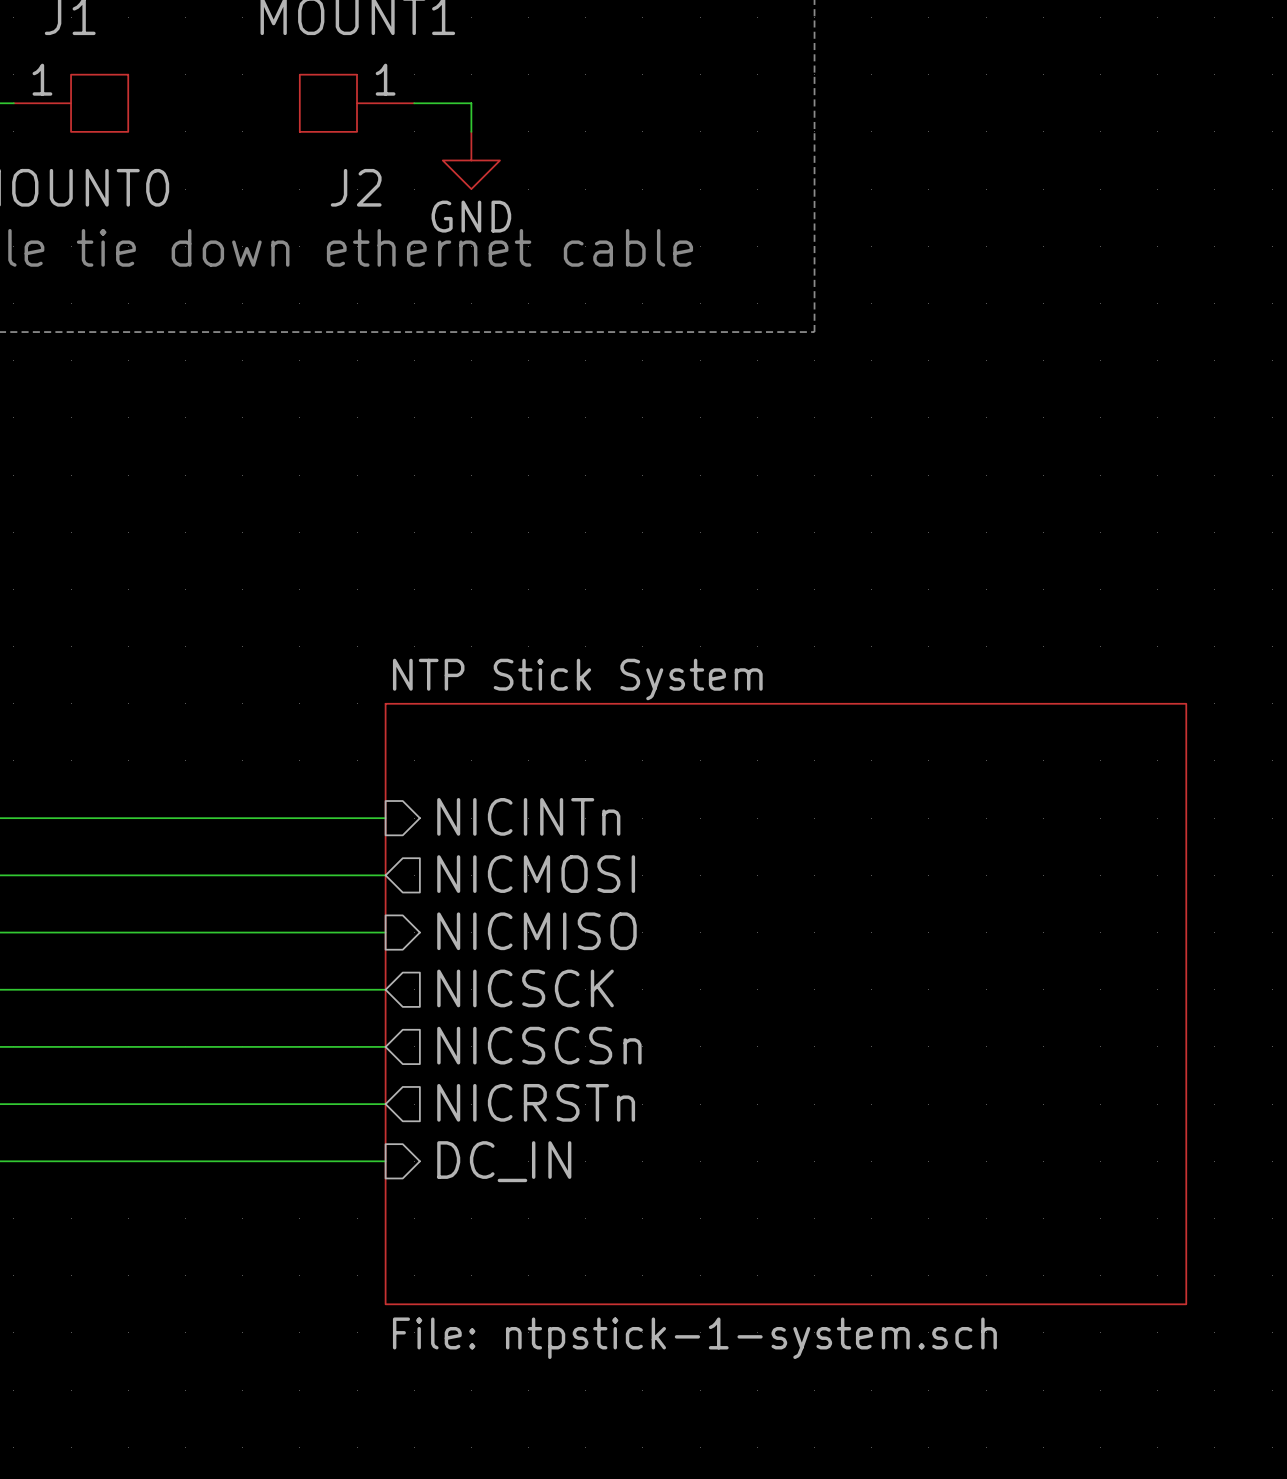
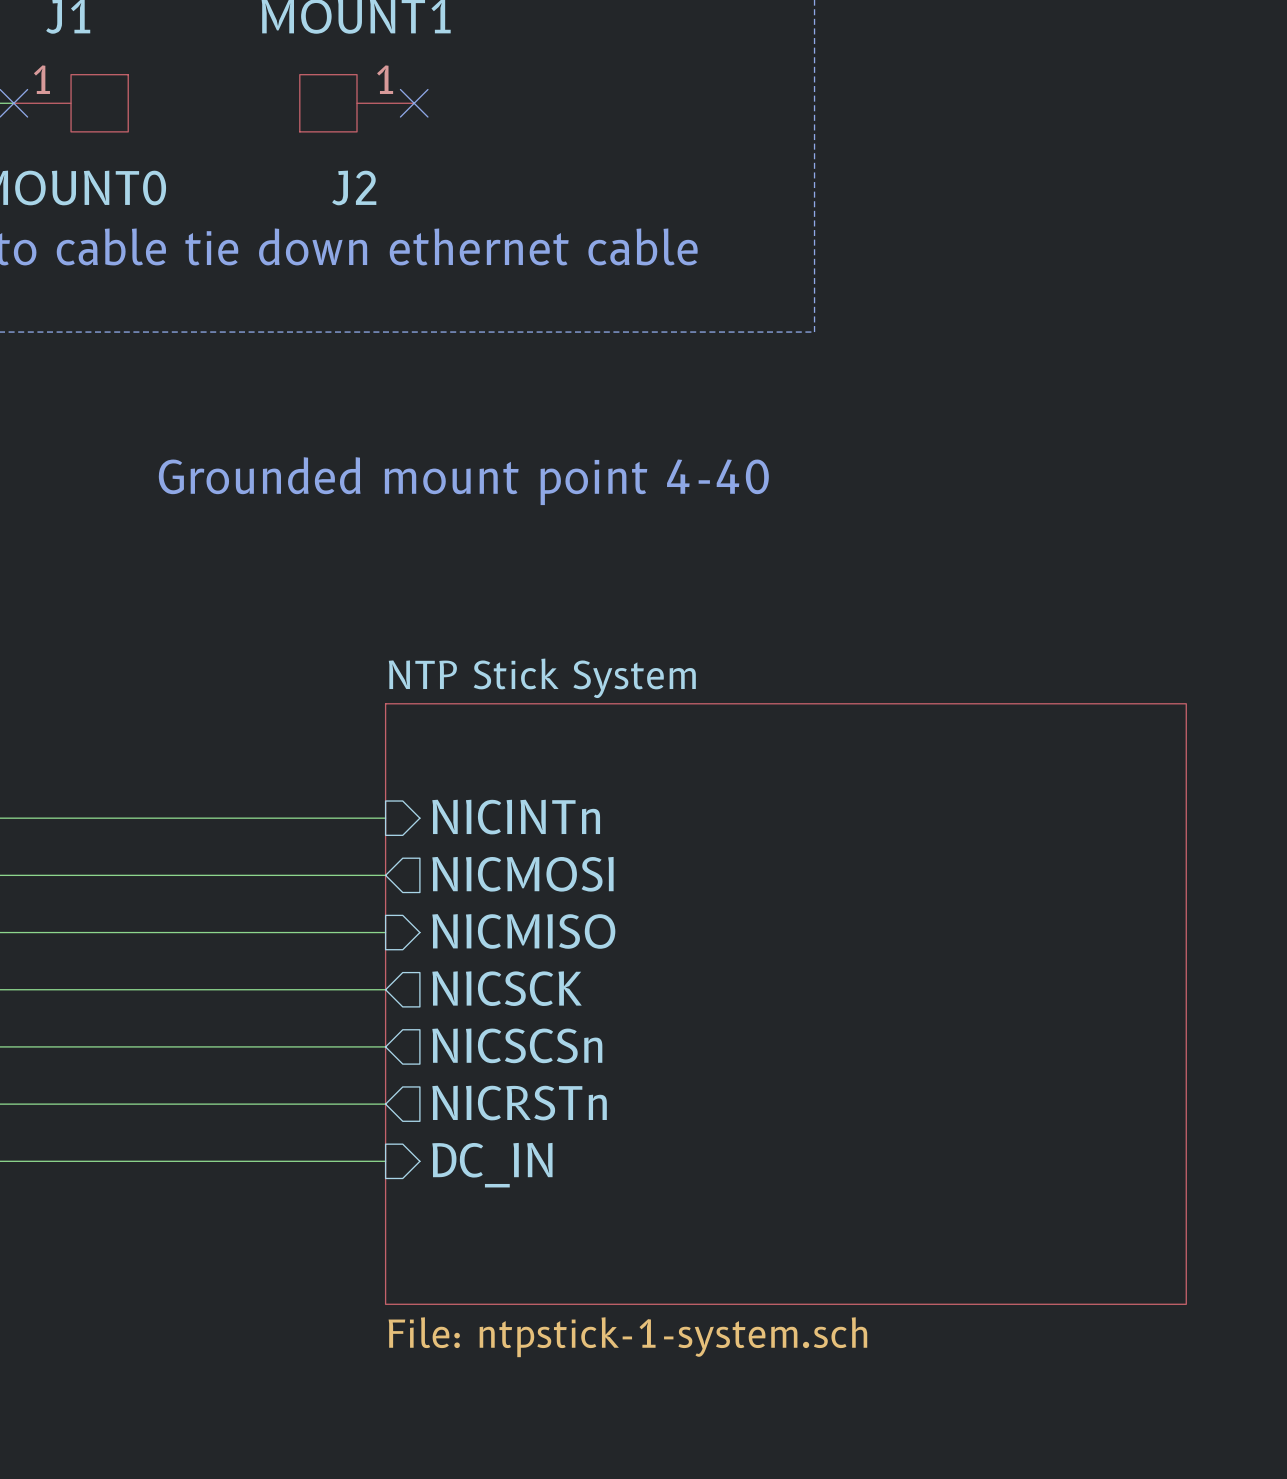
no-connect mark: none -> (13, 103)
wire: (414, 103) (471, 103) (471, 131) -> none
no-connect mark: none -> (414, 103)
power symbol: GND (471, 160) -> none
text: none -> Grounded mount point 4-40 (463, 481)

